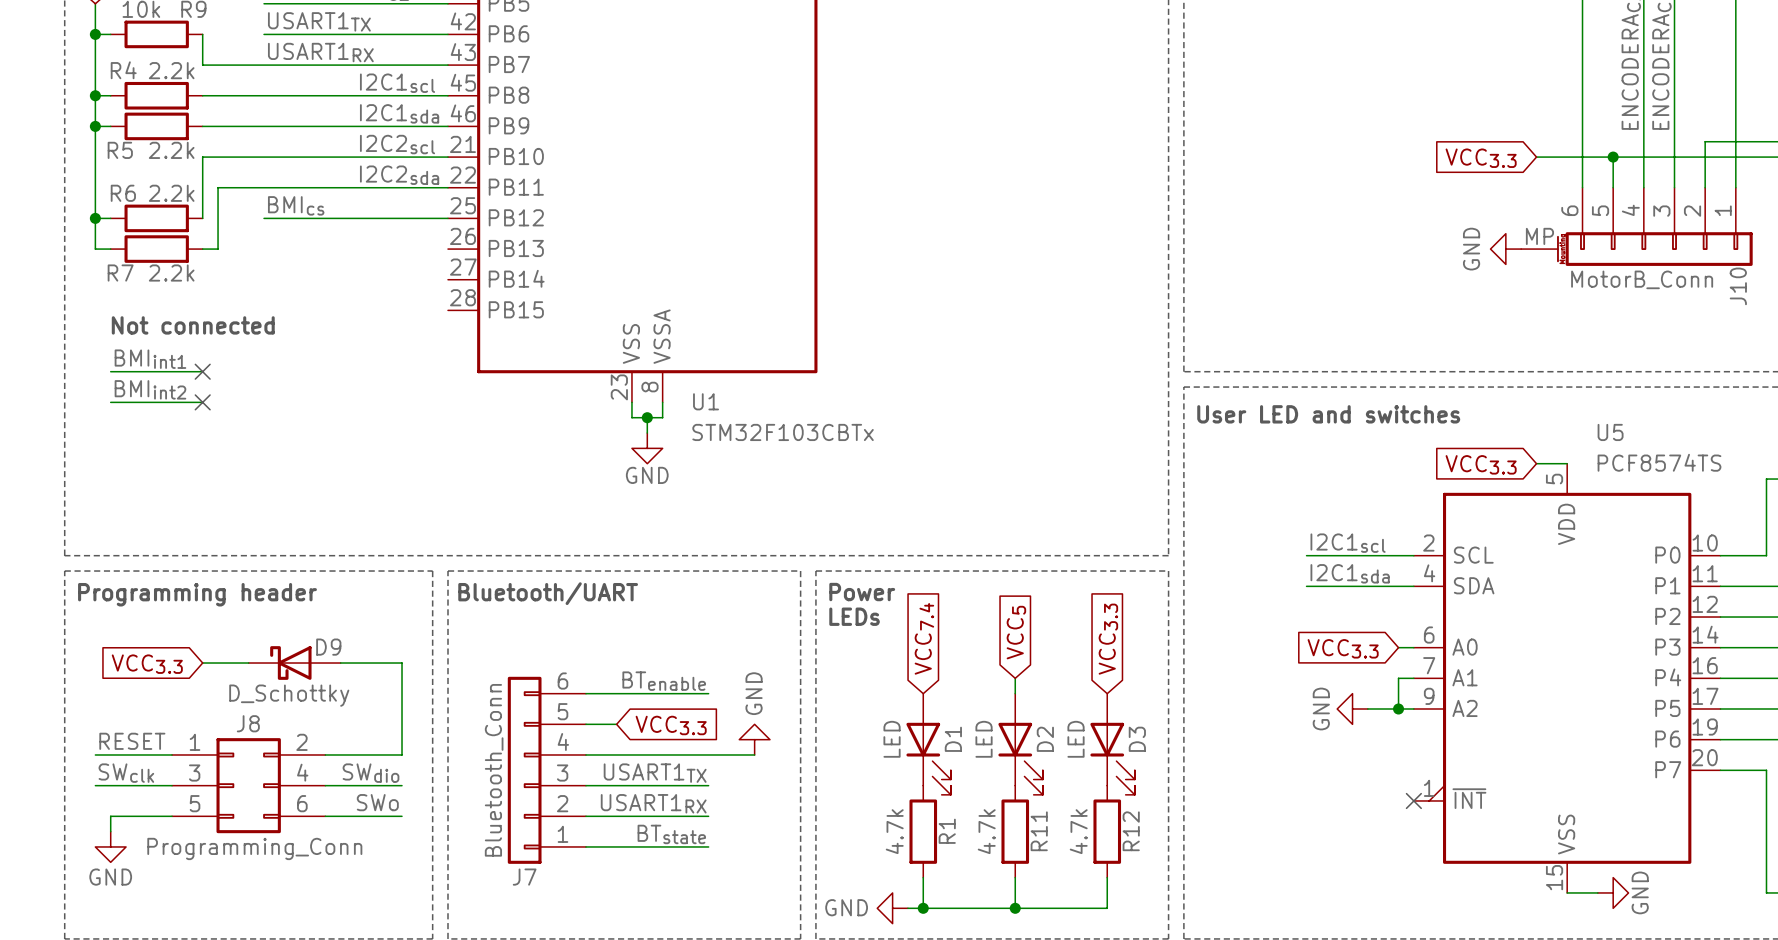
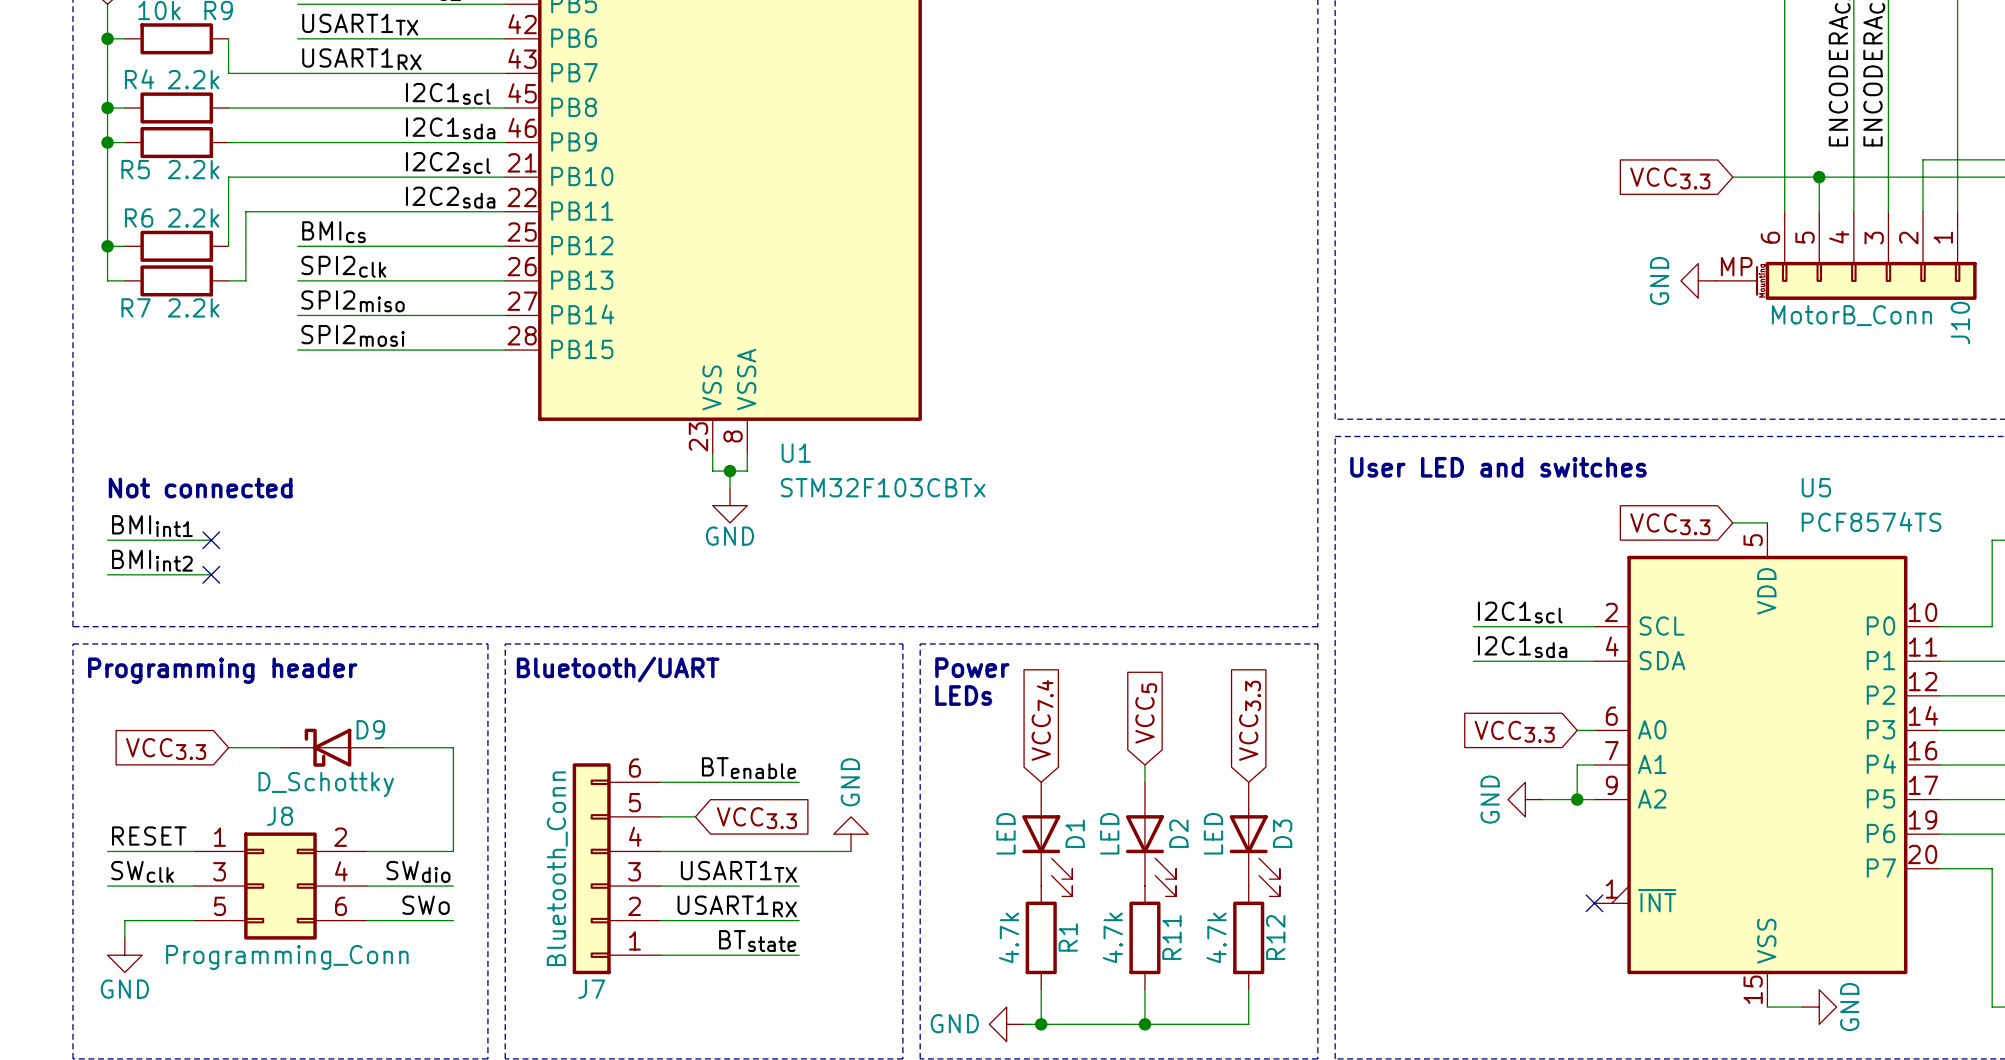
label: none -> SPI2clk (343, 266)
wire: none -> (297, 280) (505, 280)
label: none -> SPI2miso (353, 301)
wire: none -> (297, 315) (505, 315)
label: none -> SPI2mosi (353, 335)
wire: none -> (297, 350) (505, 350)
text position: Not connected (193, 325) -> Not connected (200, 488)
label position: BMIint1 (150, 359) -> BMIint1 (152, 526)
wire: (110, 371) (202, 371) -> (107, 540) (211, 540)
no-connect mark: (202, 371) -> none
label position: BMIint2 (150, 389) -> BMIint2 (152, 560)
wire: (110, 402) (202, 402) -> (107, 574) (211, 574)
no-connect mark: (202, 402) -> none
no-connect mark: none -> (211, 540)
no-connect mark: none -> (211, 574)

